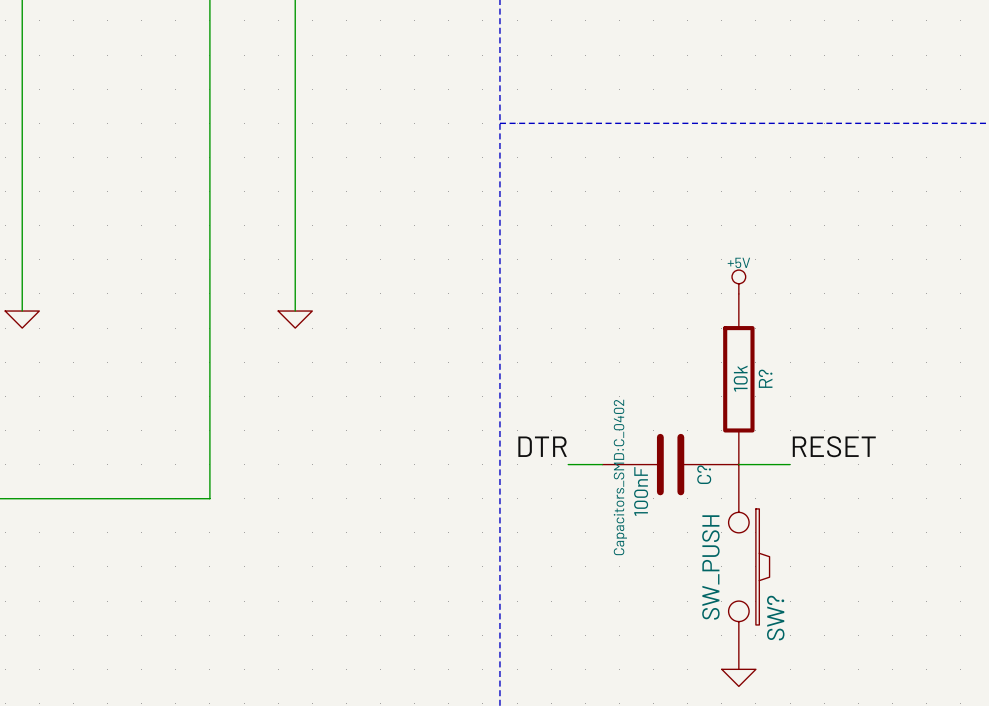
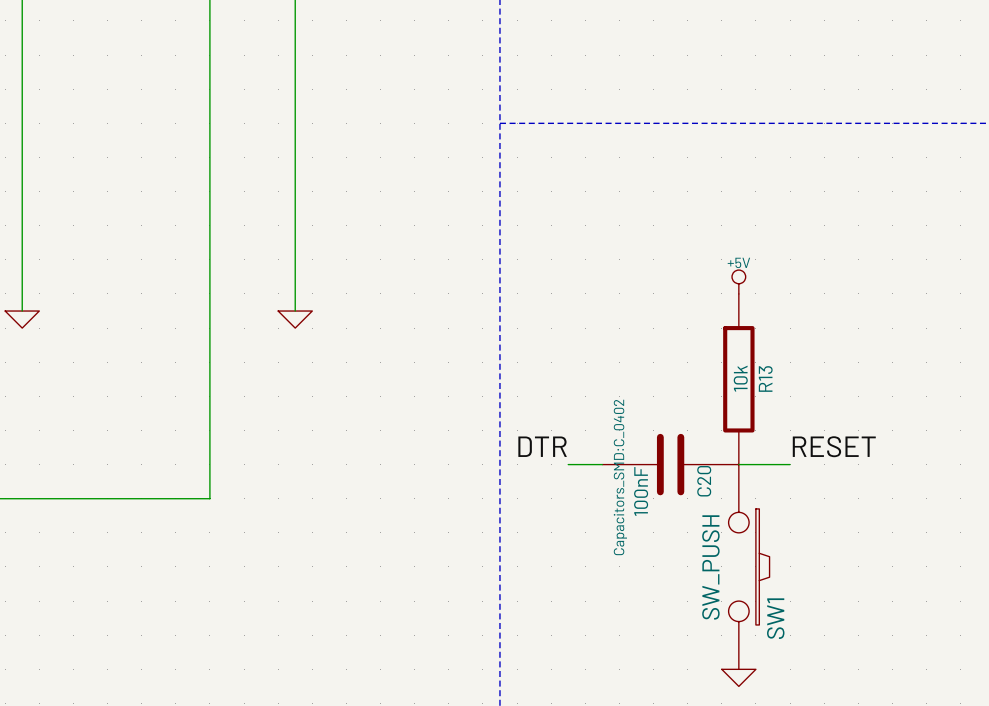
R? name: R? (765, 378) -> R13 (765, 378)
C? name: C? (704, 474) -> C20 (704, 481)
SW? name: SW? (775, 618) -> SW1 (775, 618)

